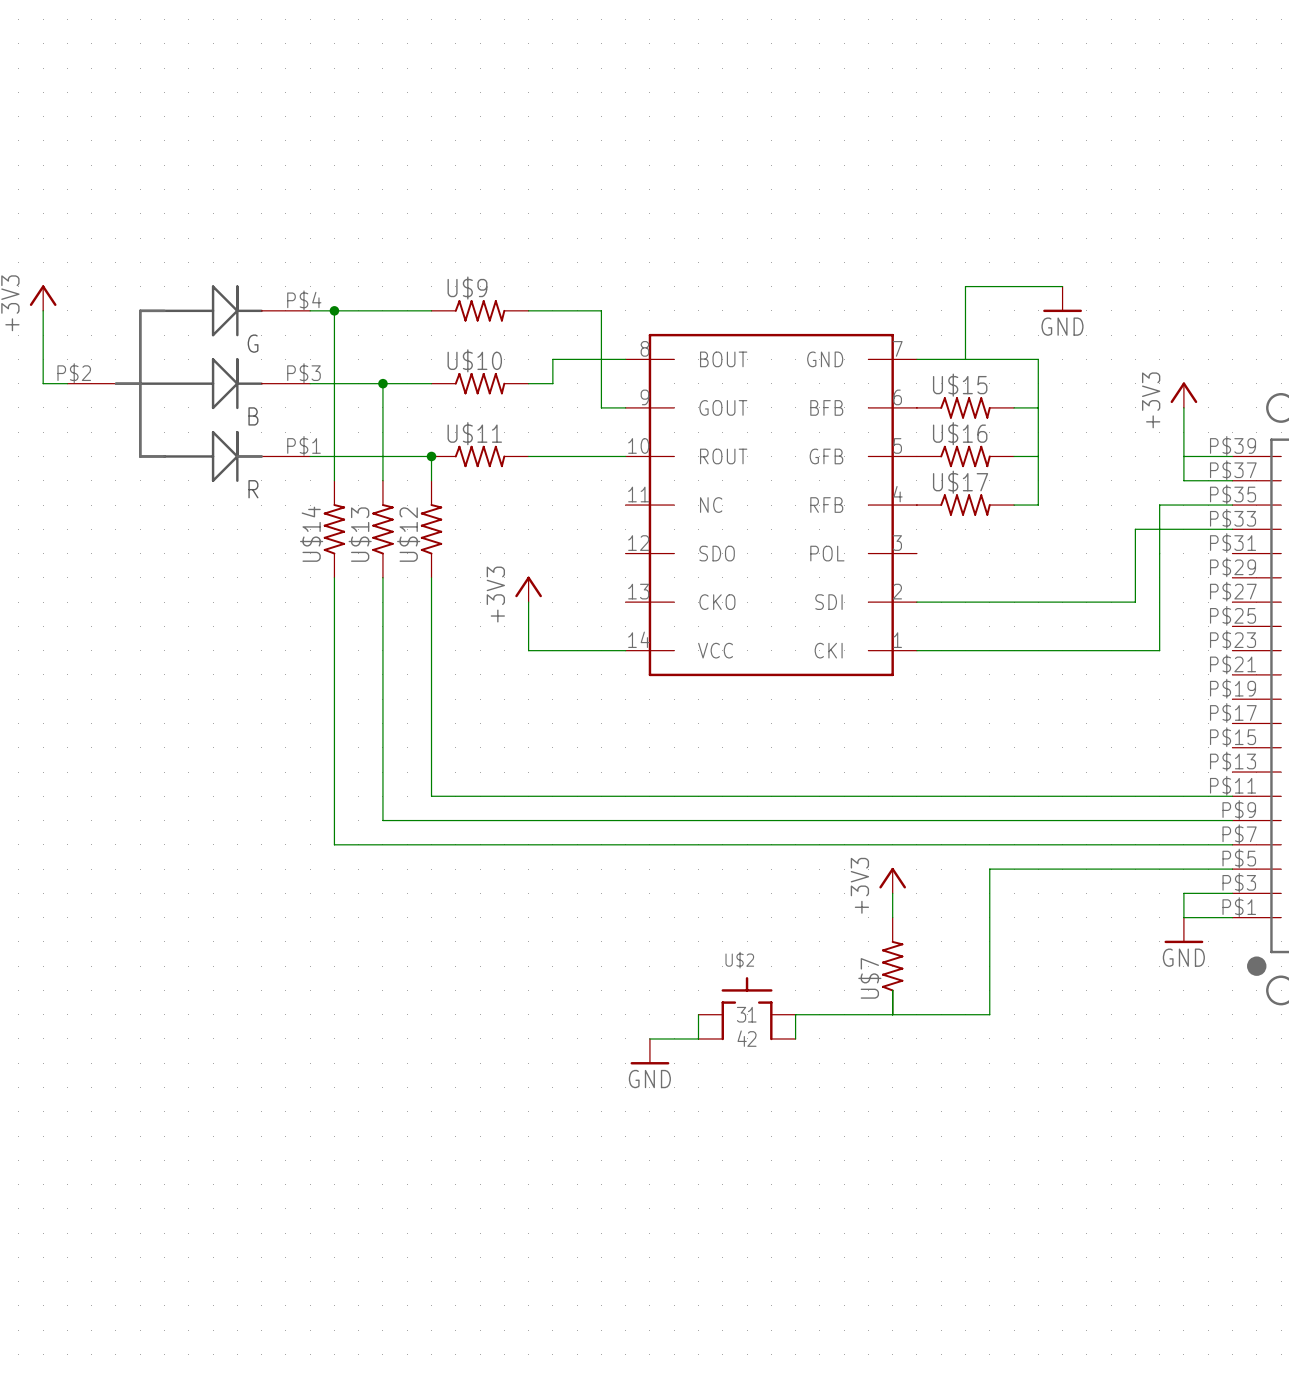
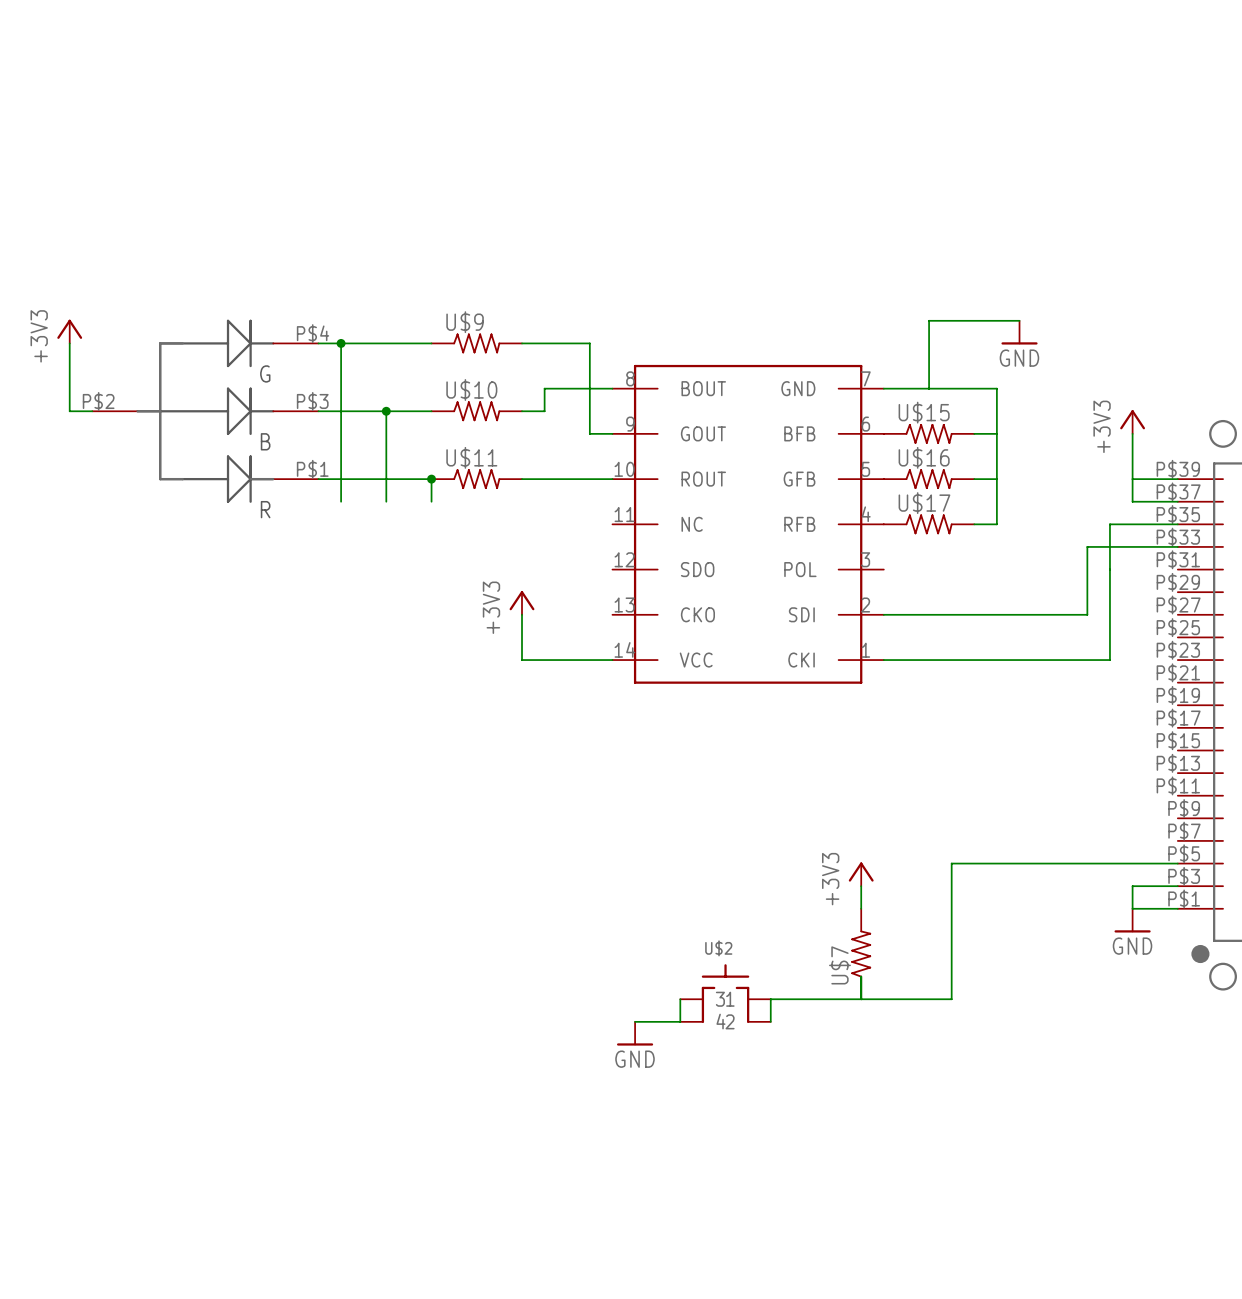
U$14: (334, 529) -> none
U$13: (382, 529) -> none
U$12: (431, 529) -> none
wire: (334, 577) (334, 844) (1232, 844) -> none
wire: (382, 577) (382, 820) (1232, 820) -> none
wire: (431, 577) (431, 796) (1232, 796) -> none

